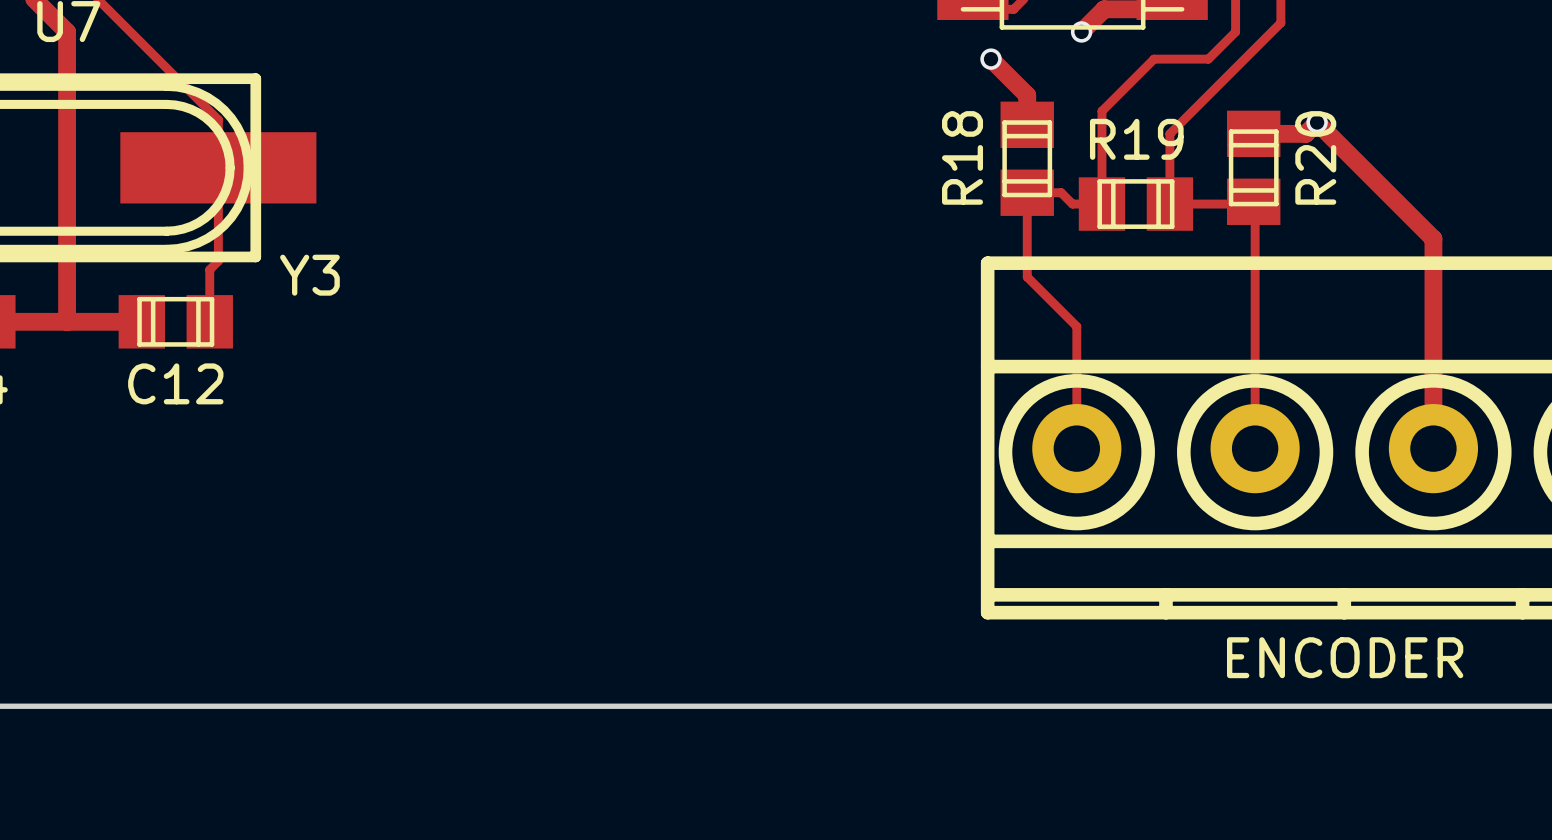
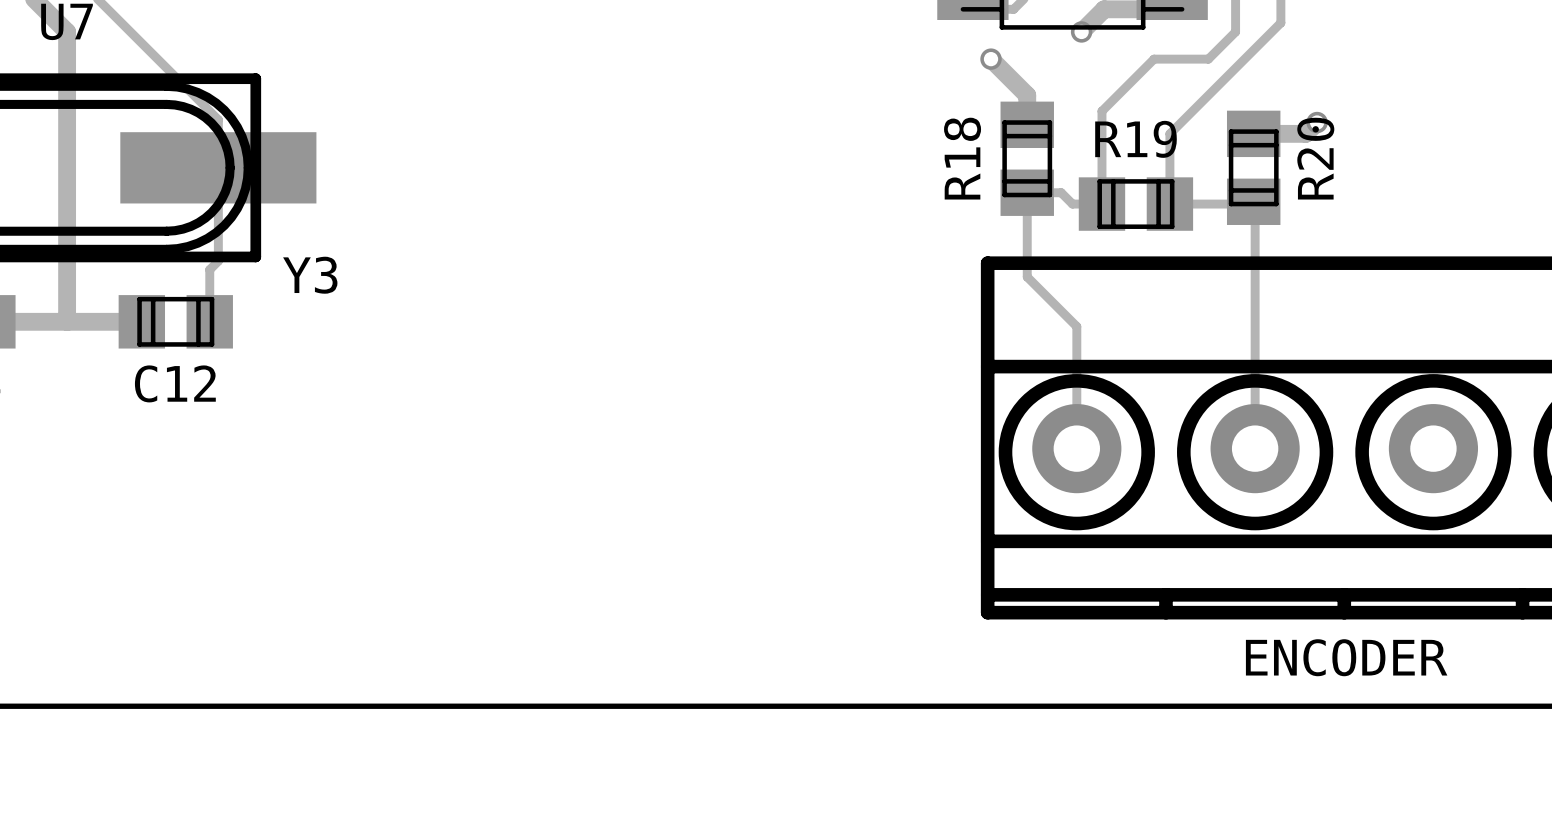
track: (1317, 122) (1433, 238) (1433, 448) -> none

